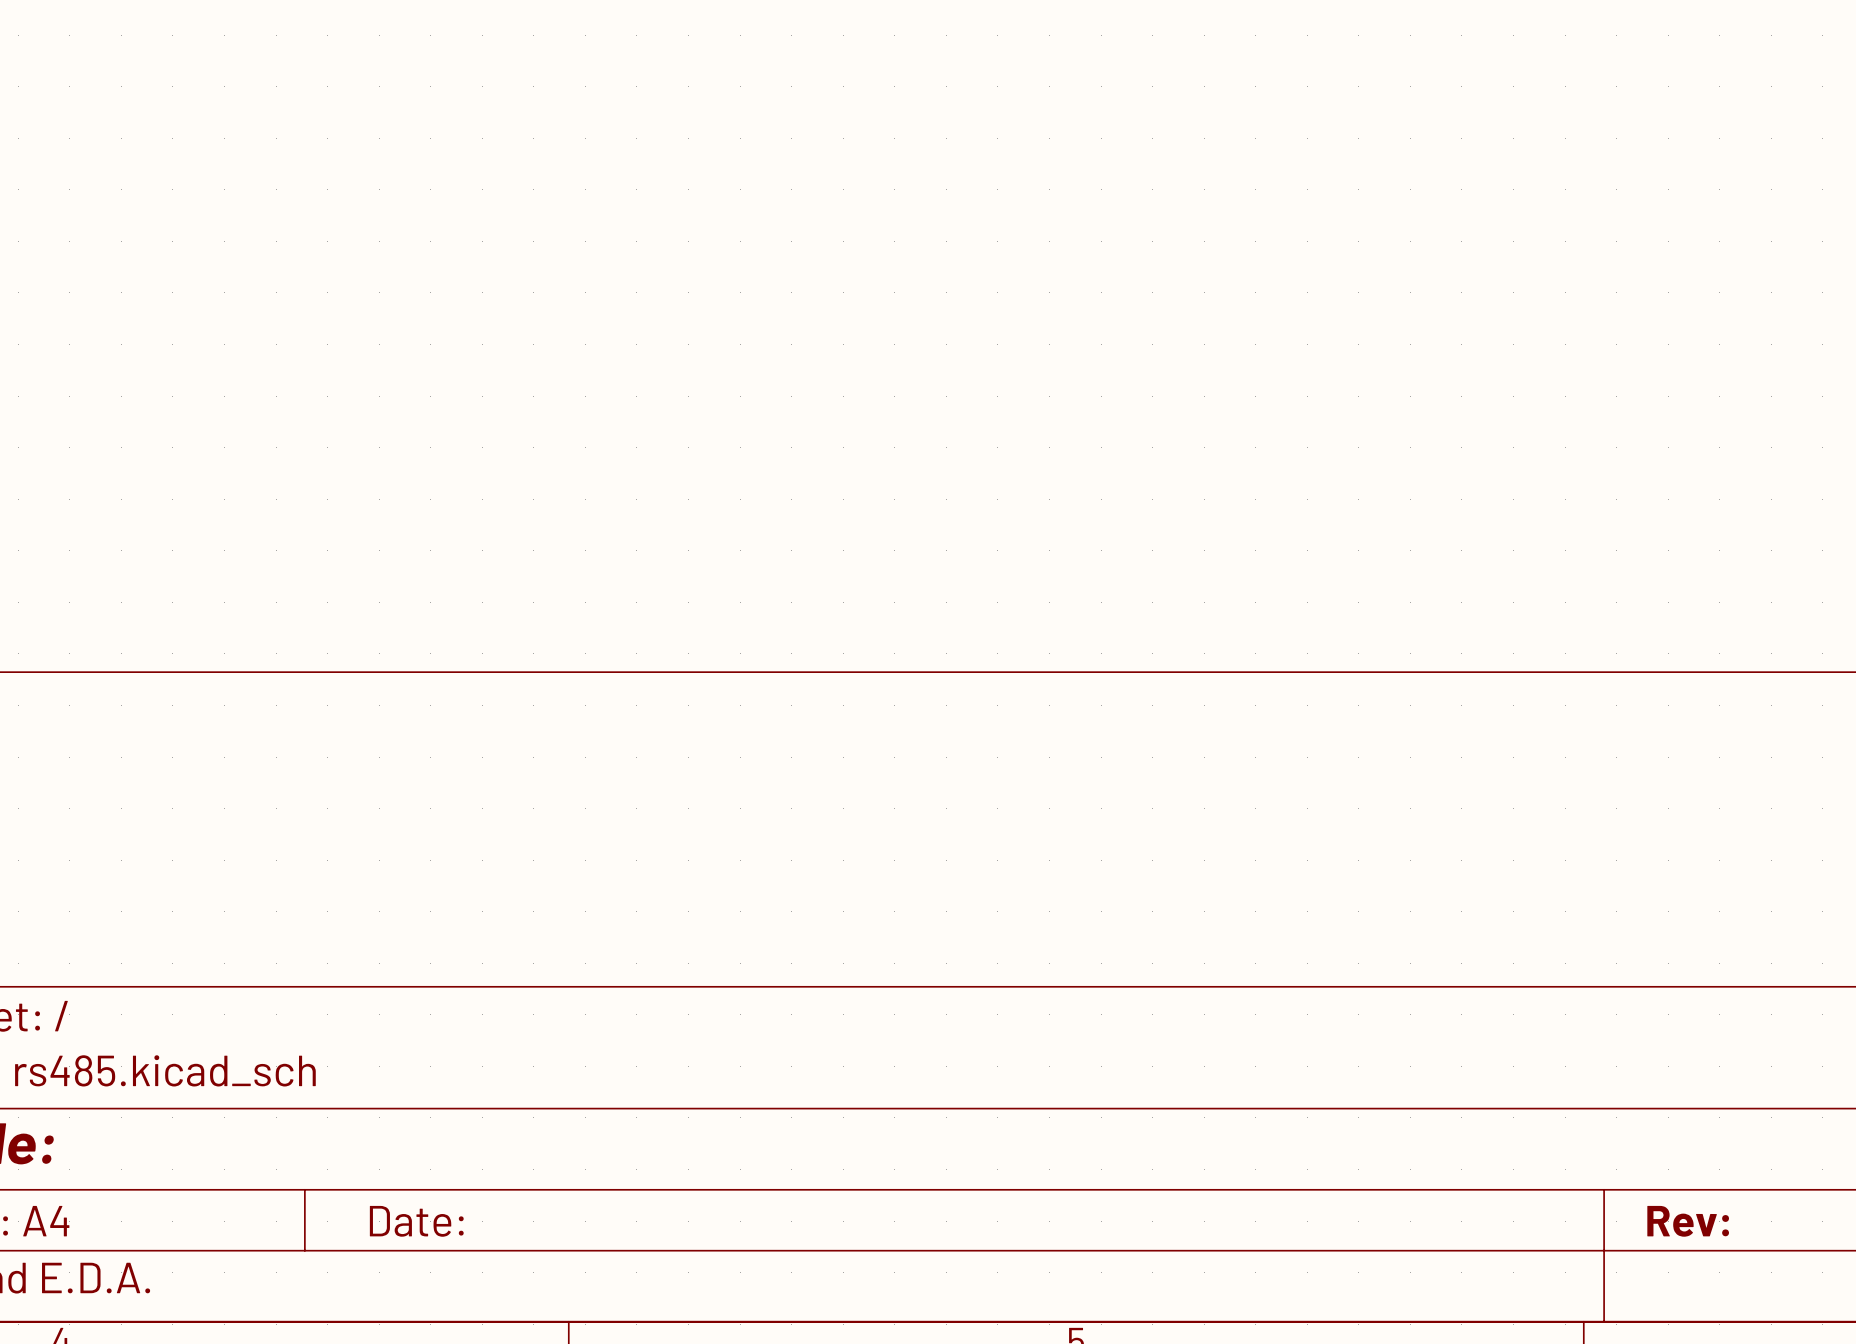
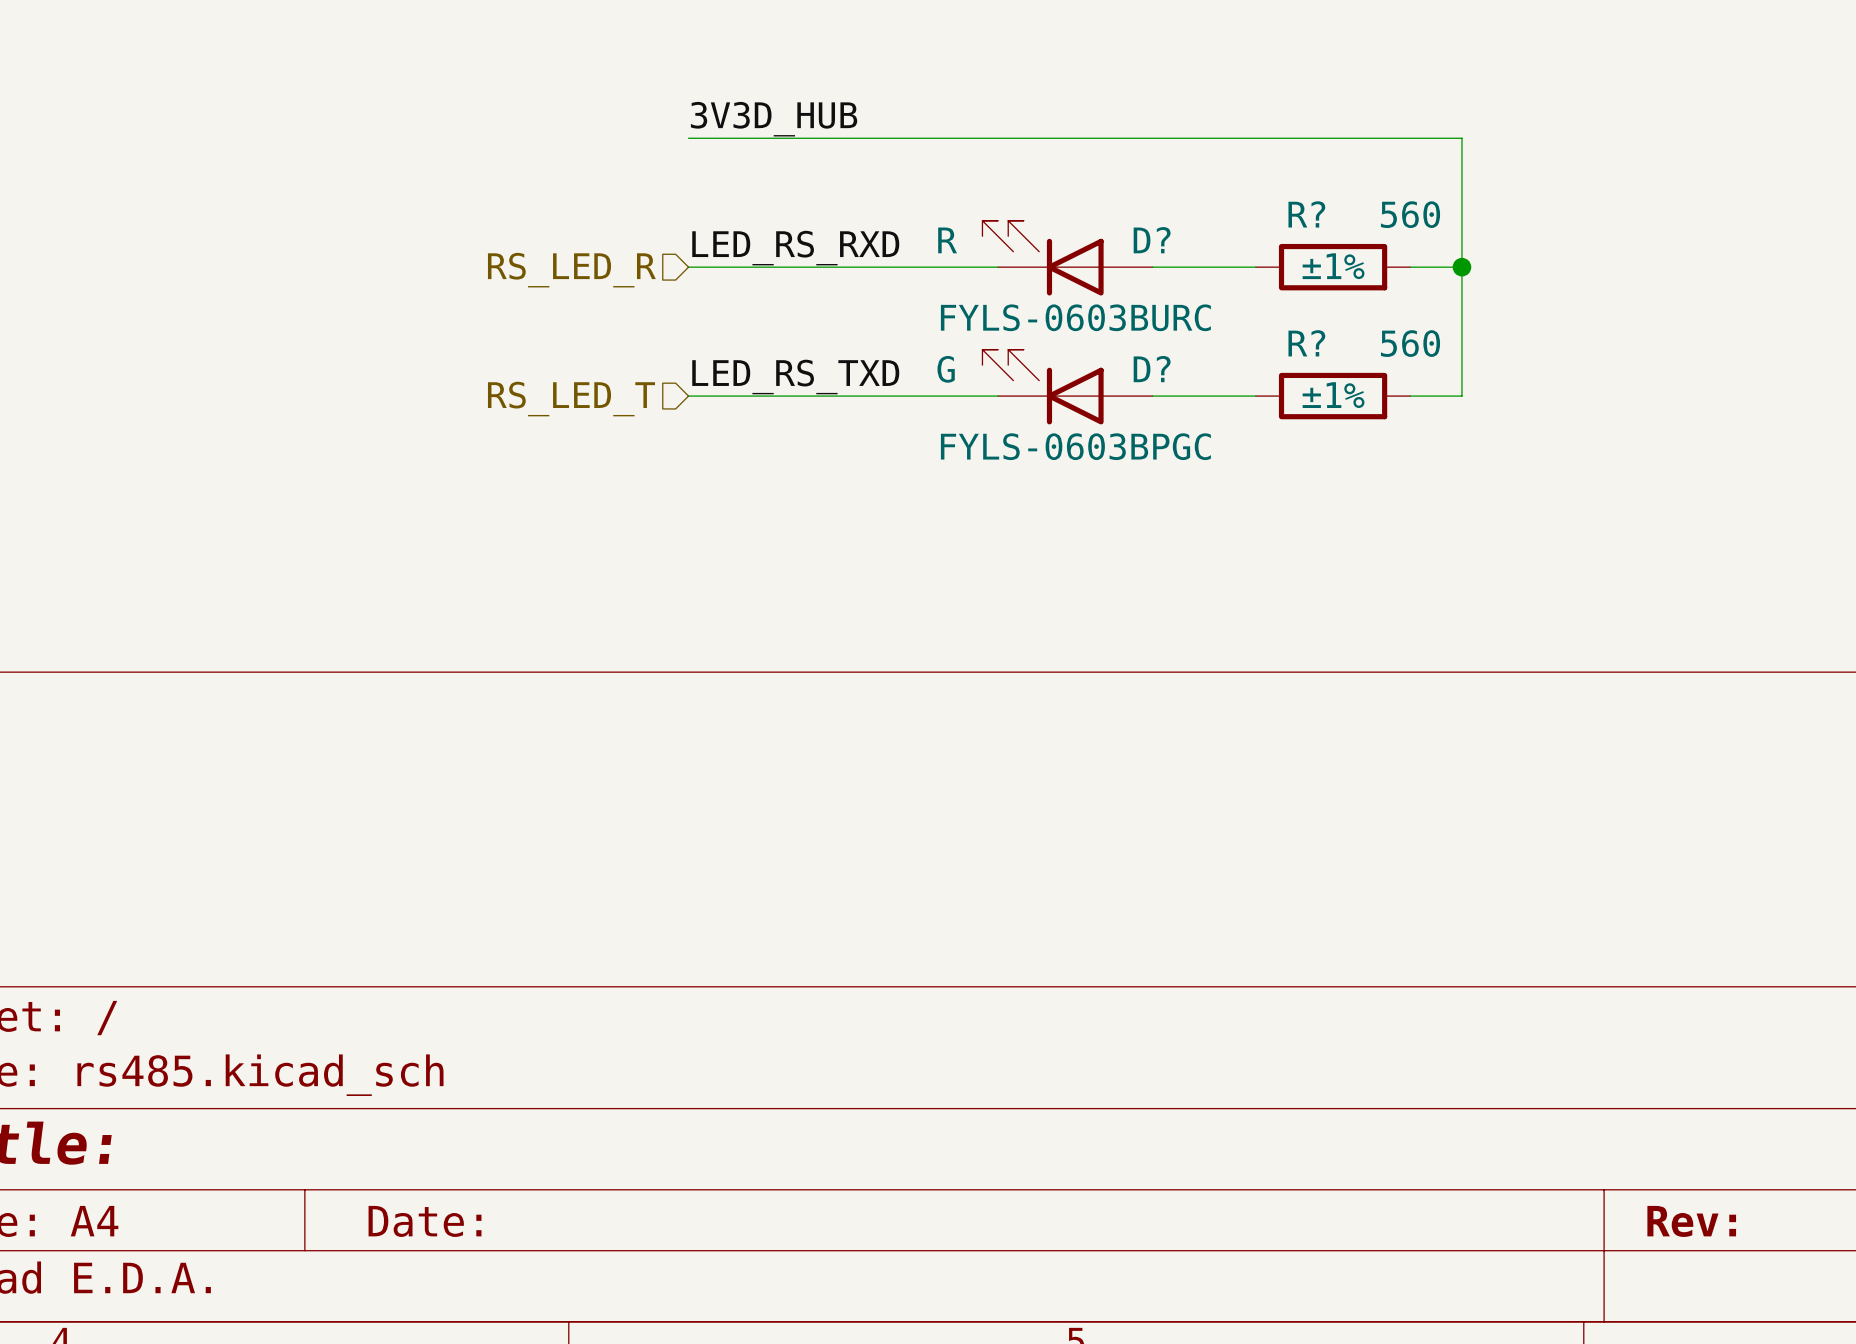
label: none -> 3V3D_HUB (774, 119)
wire: none -> (688, 138) (1461, 138) (1461, 396) (1410, 396)
label: none -> LED_RS_RXD (795, 248)
D?: none -> FYLS-0603BURC (1067, 258)
hierarchical label: none -> RS_LED_R (571, 270)
wire: none -> (688, 267) (997, 267)
wire: none -> (1152, 267) (1255, 267)
R?: none -> 560 (1333, 267)
wire: none -> (1410, 267) (1461, 267)
junction: none -> (1461, 267)
label: none -> LED_RS_TXD (795, 376)
D?: none -> FYLS-0603BPGC (1067, 387)
hierarchical label: none -> RS_LED_T (571, 399)
wire: none -> (688, 396) (997, 396)
wire: none -> (1152, 396) (1255, 396)
R?: none -> 560 (1333, 396)

